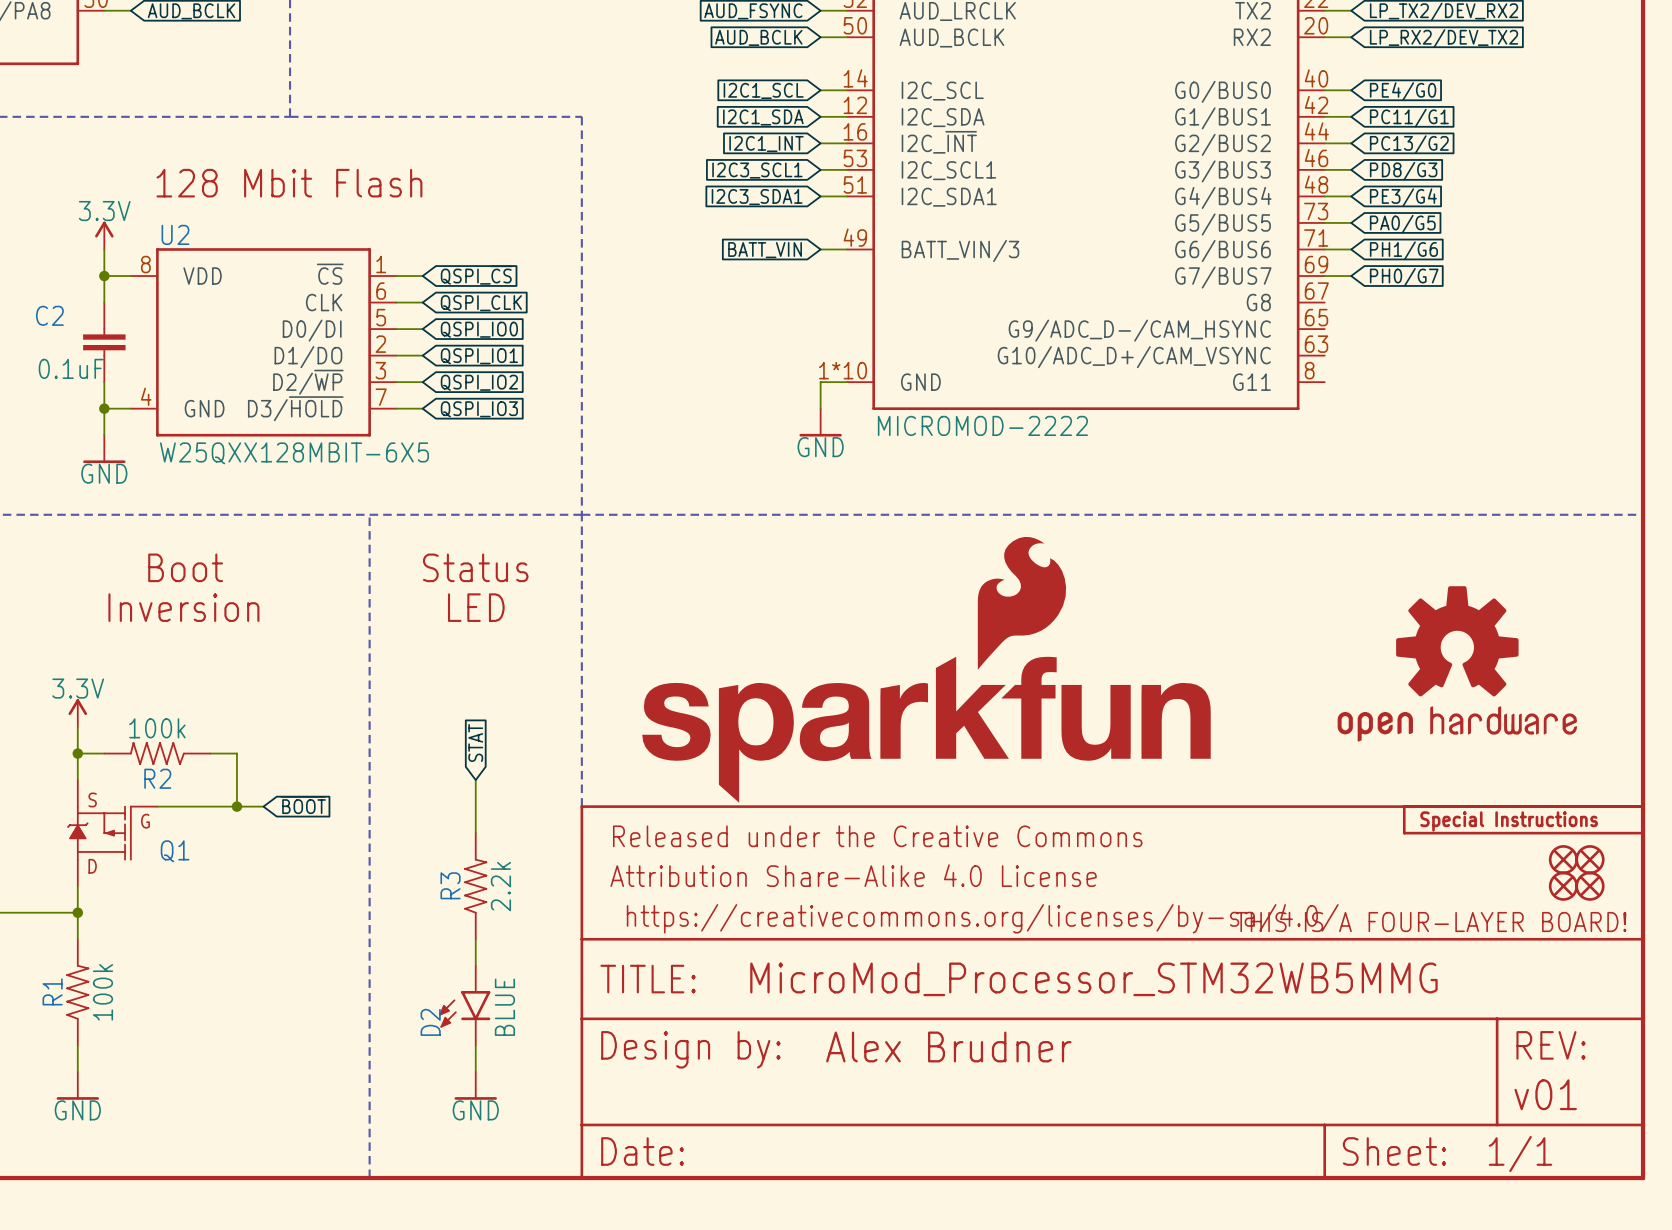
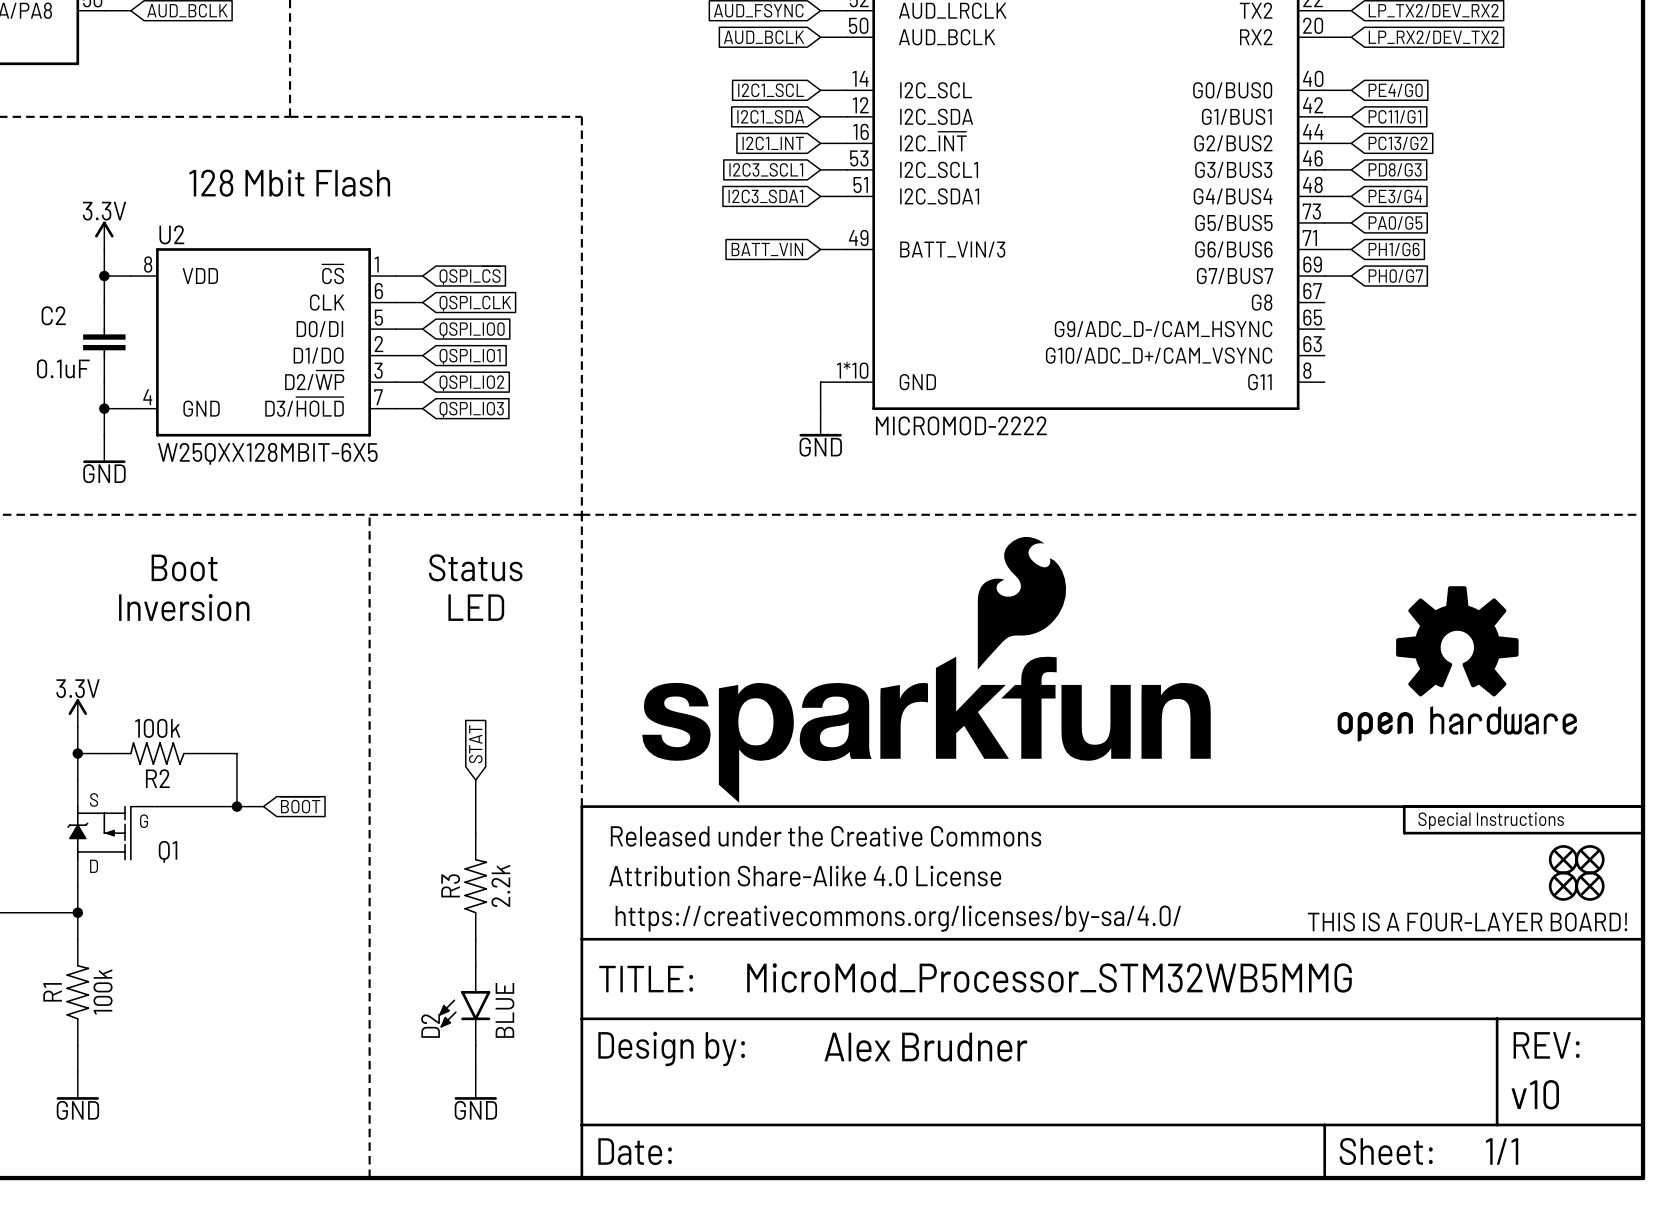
part text: v01 (1545, 1094) -> v10 (1535, 1094)

